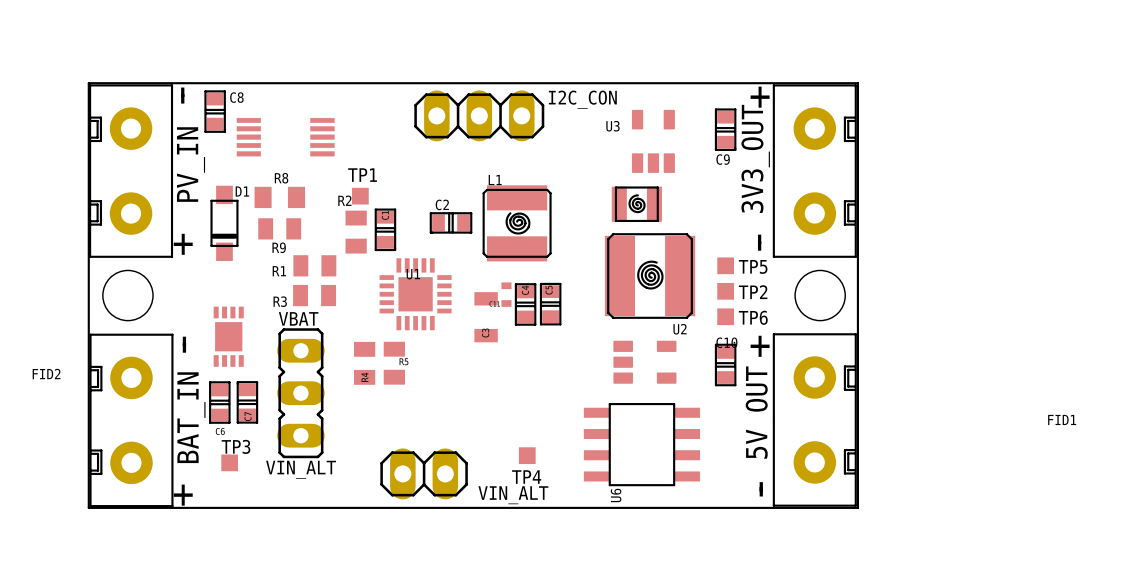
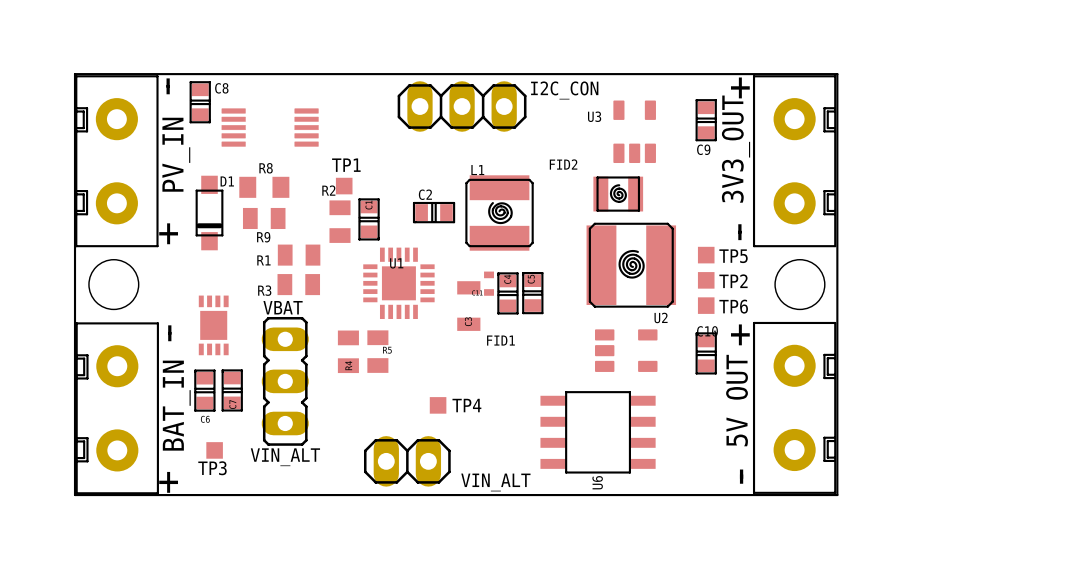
FID2 position: (46, 374) -> (563, 164)
FID1 position: (1062, 419) -> (500, 340)
U6 position: (641, 444) -> (598, 432)
TP3 name position: TP3 (235, 446) -> TP3 (212, 468)
TP4 position: (527, 455) -> (438, 405)
TP4 name position: TP4 (526, 477) -> TP4 (466, 405)

